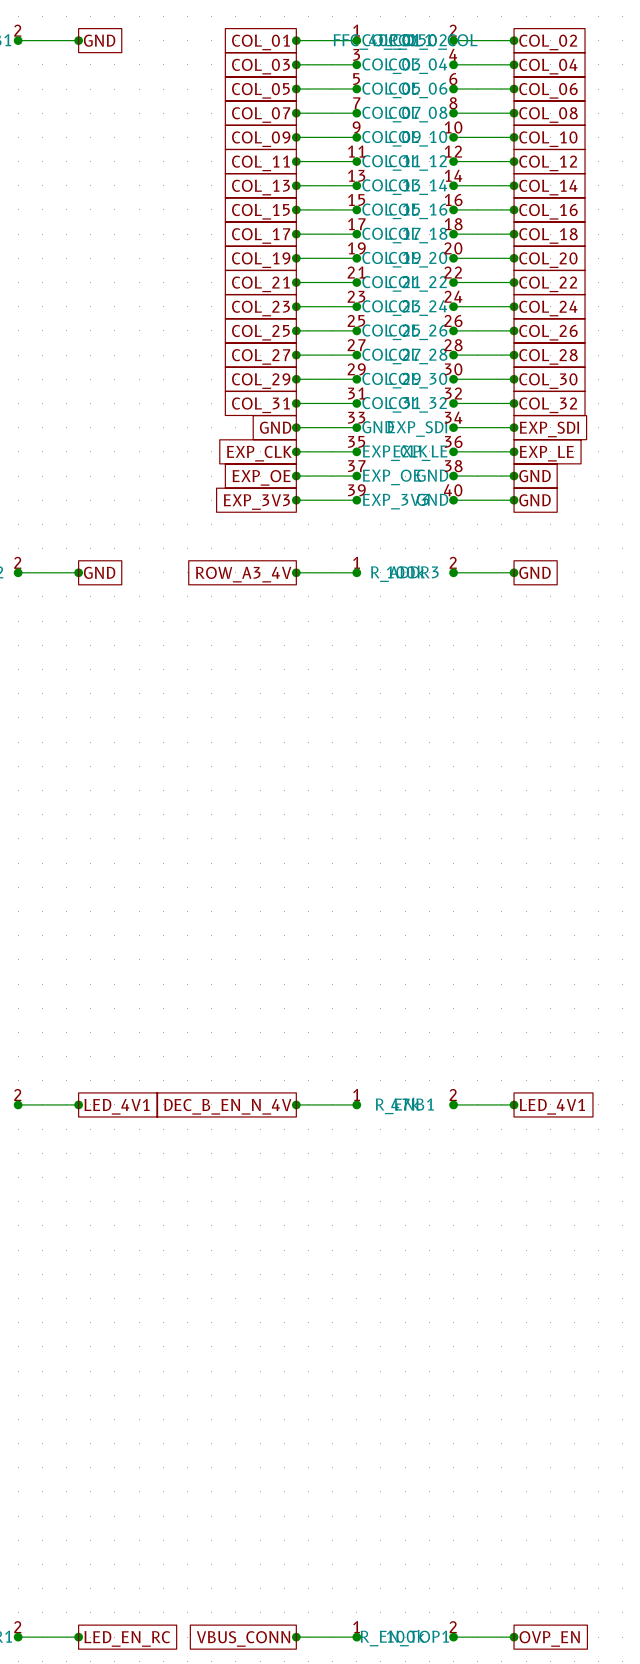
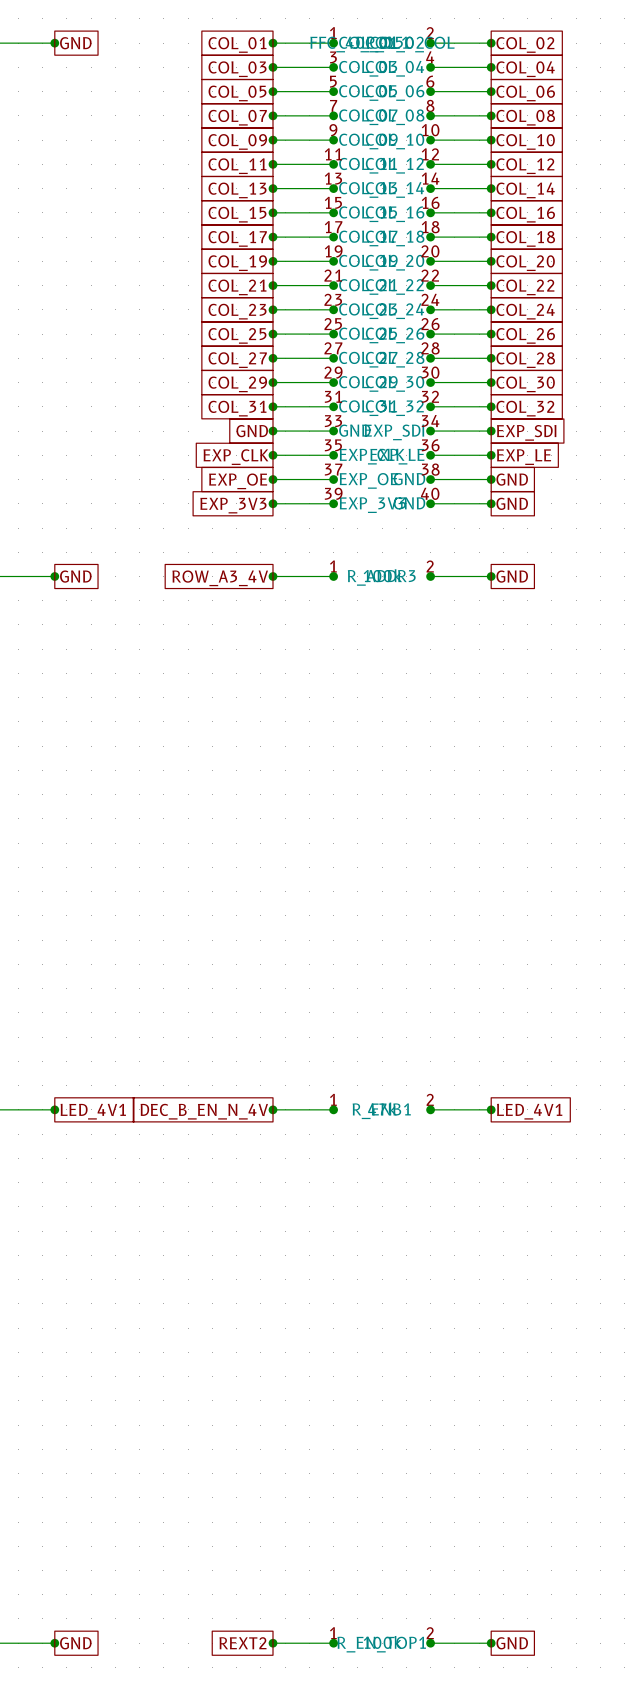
global label: LED_EN_RC (127, 1638) -> GND (75, 1643)
global label: VBUS_CONN (243, 1638) -> REXT2 (242, 1643)
global label: OVP_EN (549, 1638) -> GND (512, 1643)

